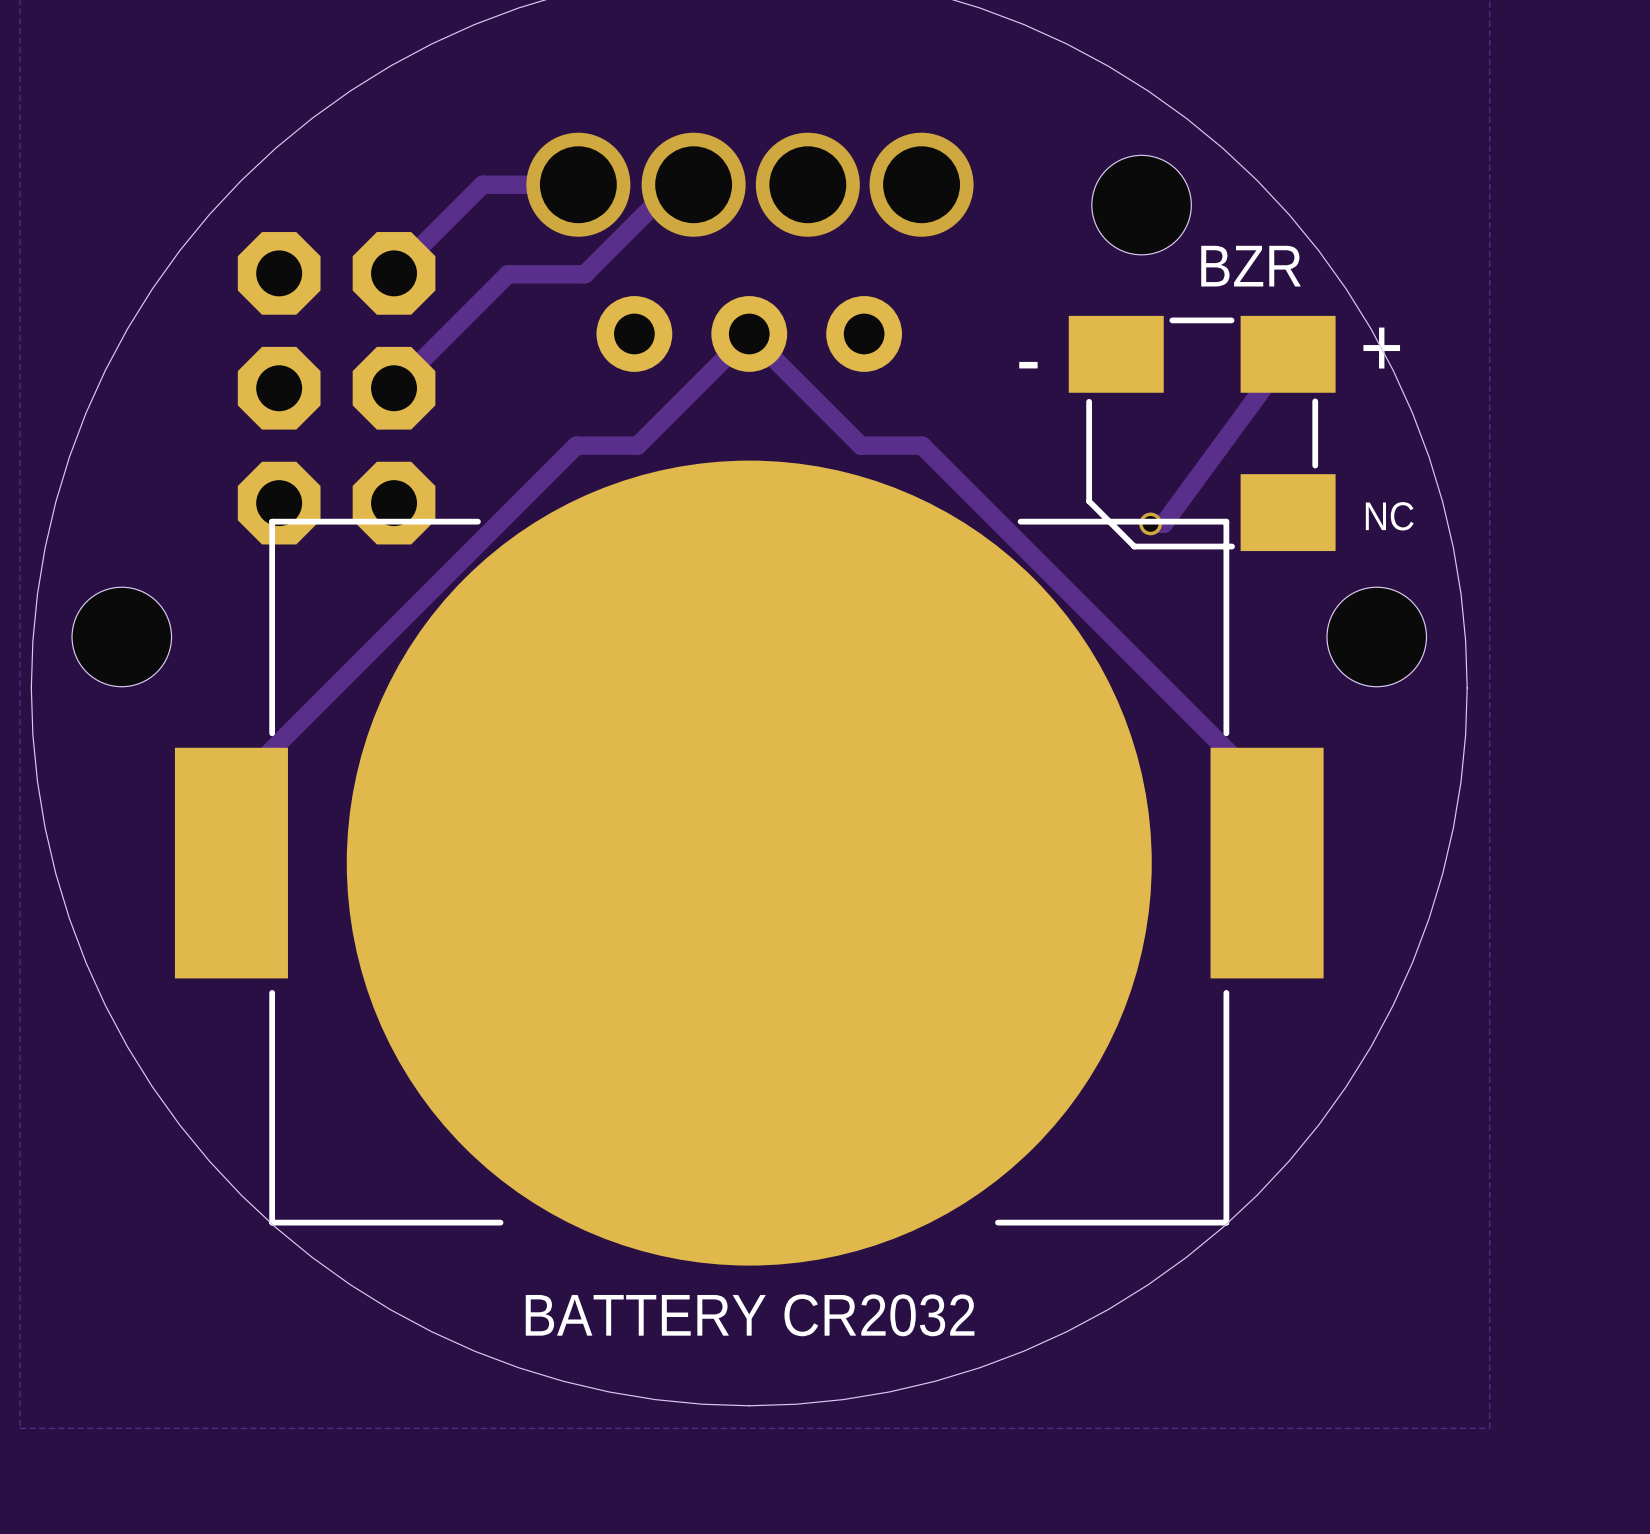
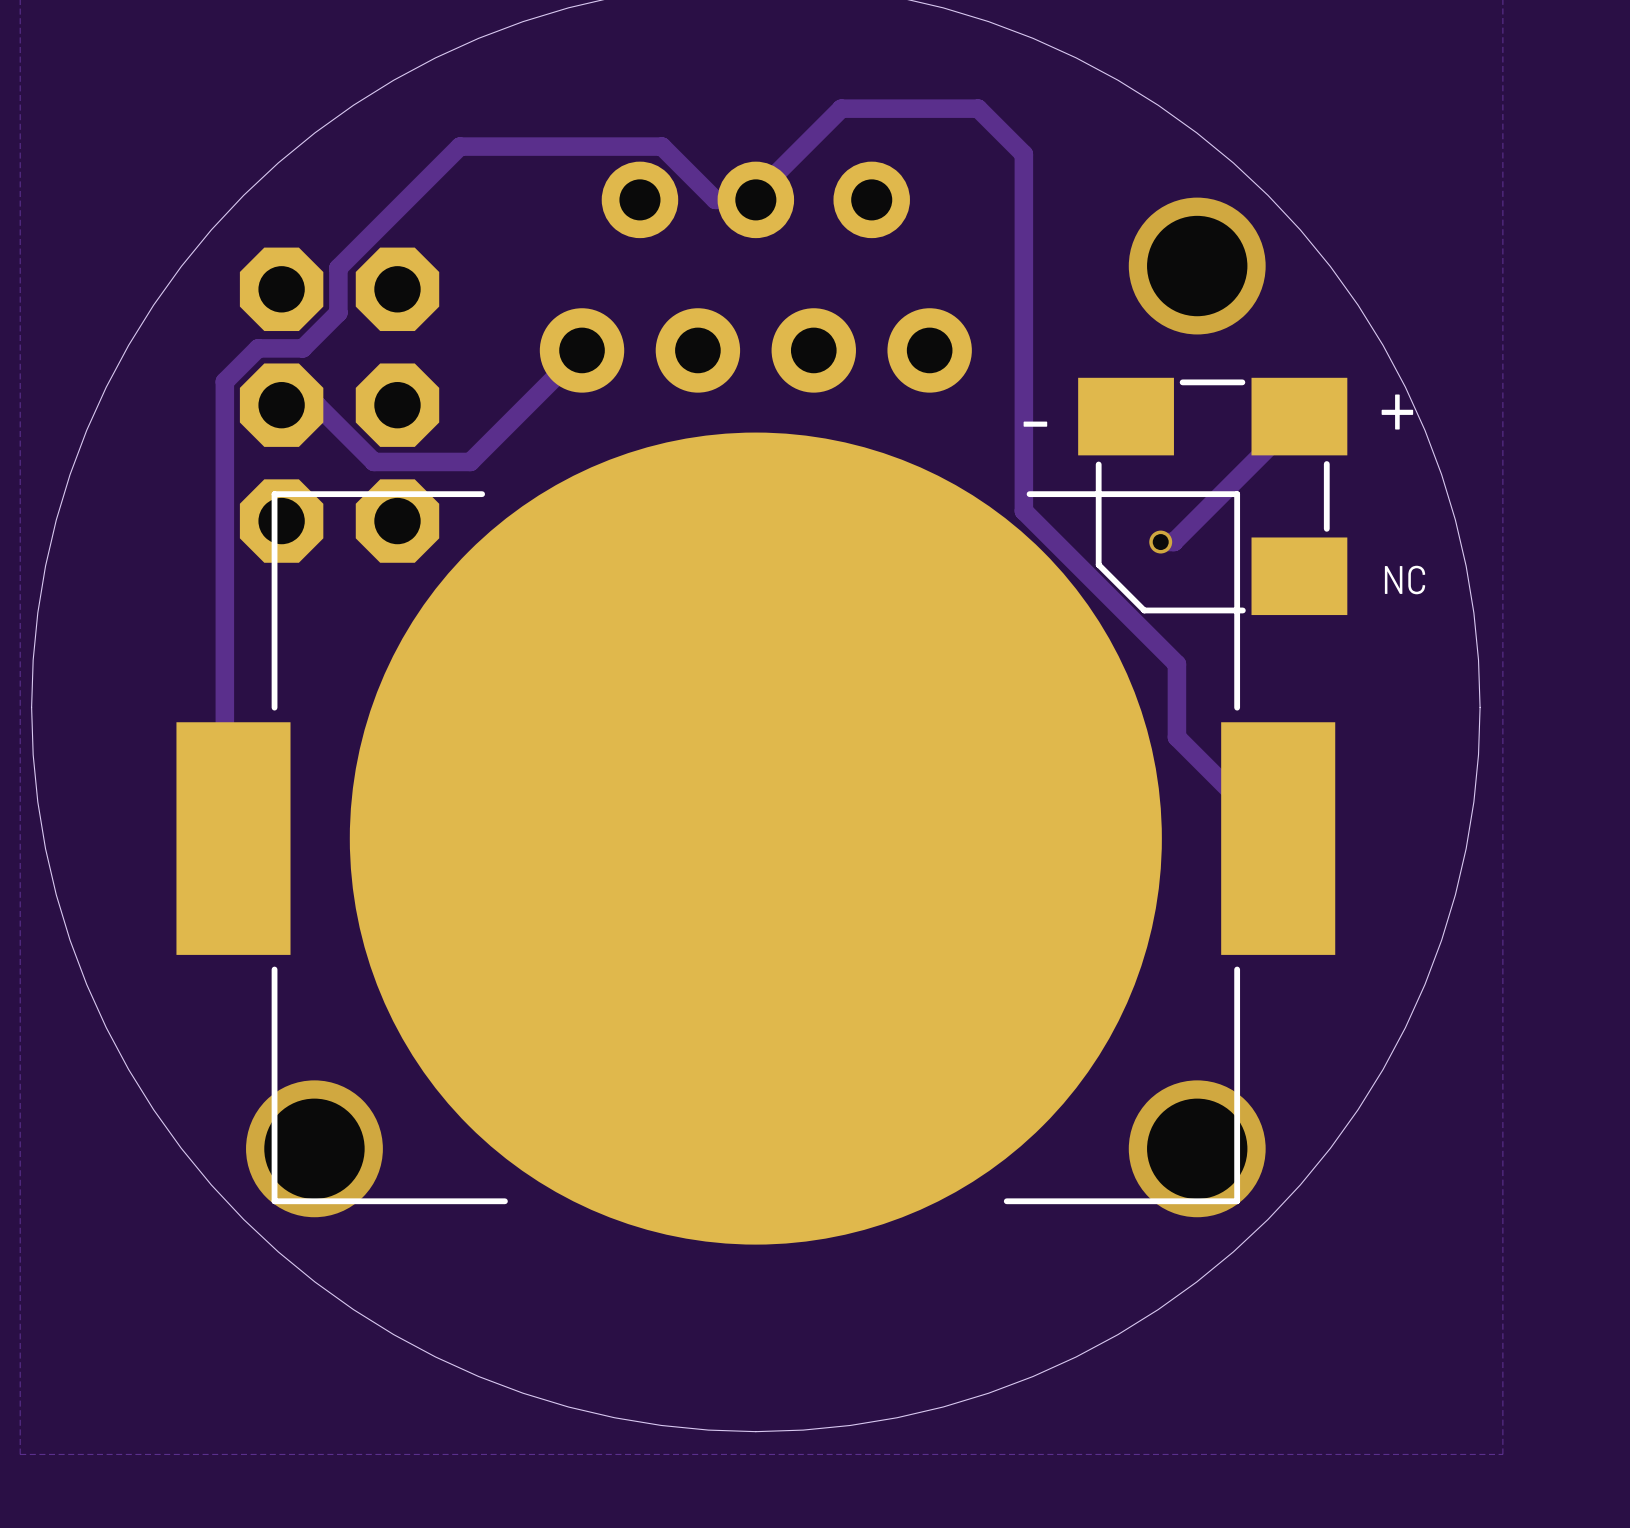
track: (578, 184) (482, 184) (394, 273) -> none
via: (578, 184) -> none
track: (693, 184) (674, 184) (584, 274) (507, 274) (394, 388) -> none
via: (693, 184) -> none
track: none -> (750, 199) (841, 108) (978, 108) (1023, 154) (1023, 511) (1176, 664) (1176, 737) (1278, 838)
track: none -> (755, 199) (715, 199) (662, 146) (459, 146) (338, 268) (338, 312) (302, 348) (258, 348) (224, 381) (224, 829) (233, 838)
part: none -> (755, 199)
via: (807, 184) -> none
via: (921, 184) -> none
hole: (1141, 205) -> none
via: none -> (1197, 266)
text: BZR (1251, 266) -> none
part footprint: [596, 296, 903, 372] -> [539, 308, 972, 393]
track: none -> (582, 350) (470, 461) (373, 461) (317, 405) (281, 405)
track: (1288, 354) (1163, 523) -> (1299, 416) (1173, 542)
part position: (1202, 433) -> (1212, 496)
hole: (121, 636) -> none
hole: (1376, 636) -> none
part position: (749, 863) -> (755, 838)
track: (1267, 863) (1267, 790) (922, 445) (860, 445) (749, 333) (637, 445) (576, 445) (231, 790) (231, 863) -> none
via: none -> (314, 1148)
via: none -> (1197, 1148)
text: BATTERY CR2032 (750, 1315) -> none

